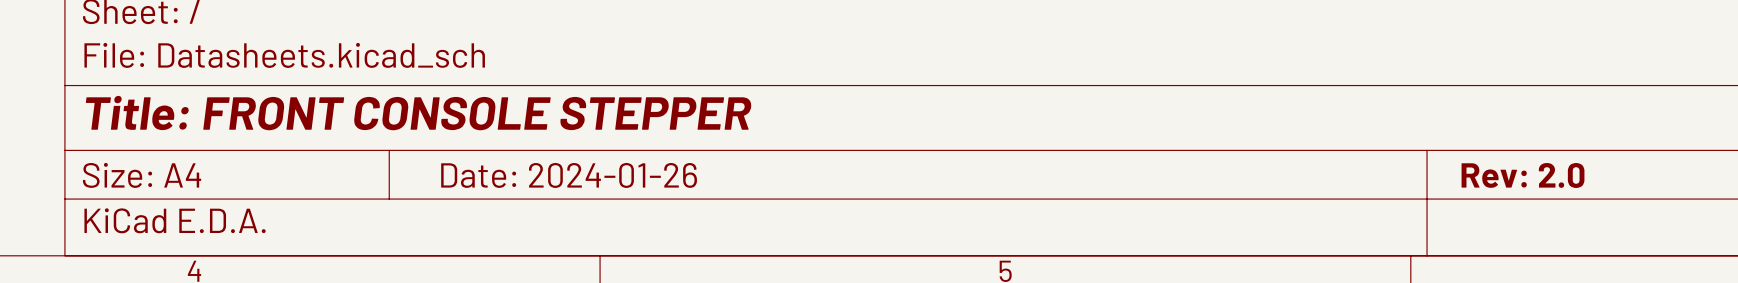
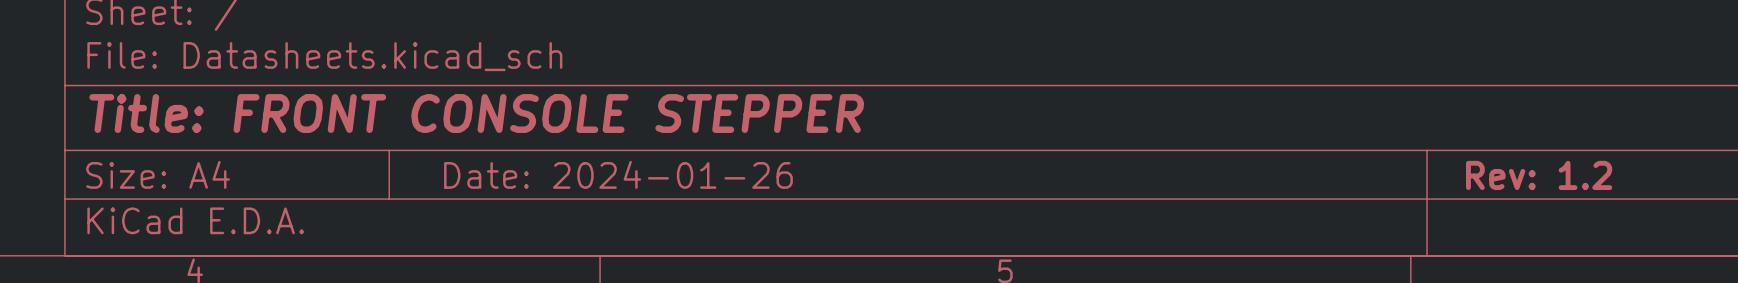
title block: Rev: 2.0 (1523, 175) -> Rev: 1.2 (1539, 175)

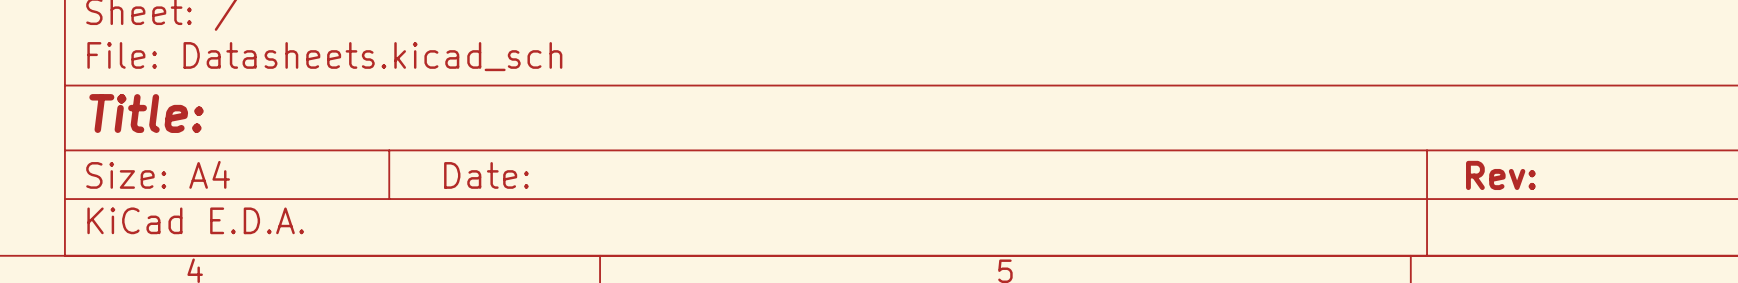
title block: Title: FRONT CONSOLE STEPPER (476, 113) -> Title: (146, 113)
title block: Date: 2024-01-26 (618, 174) -> Date: (486, 175)
title block: Rev: 1.2 (1539, 175) -> Rev: (1500, 175)

